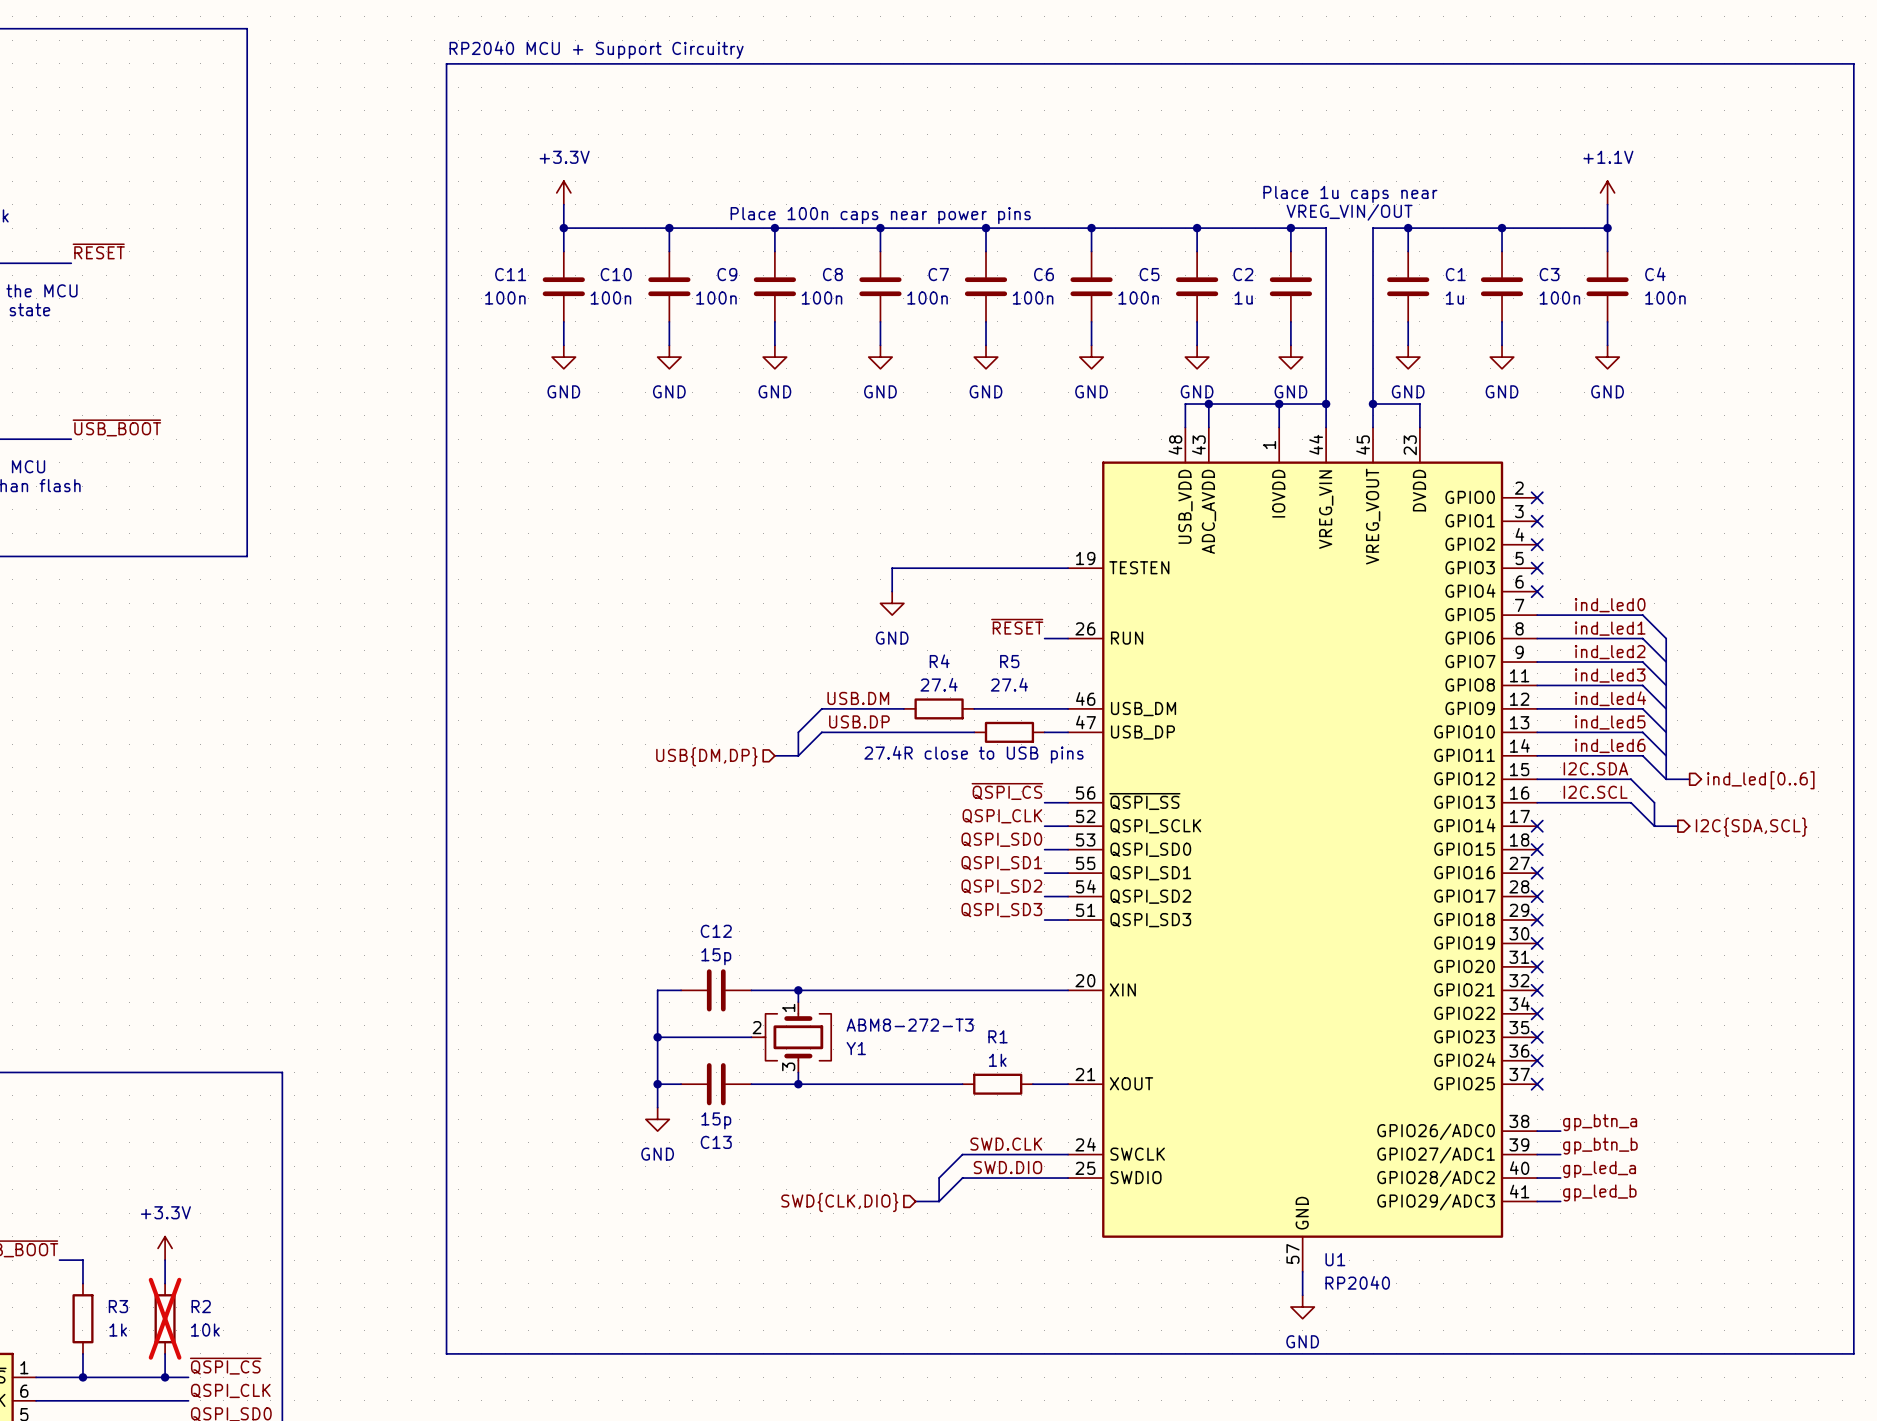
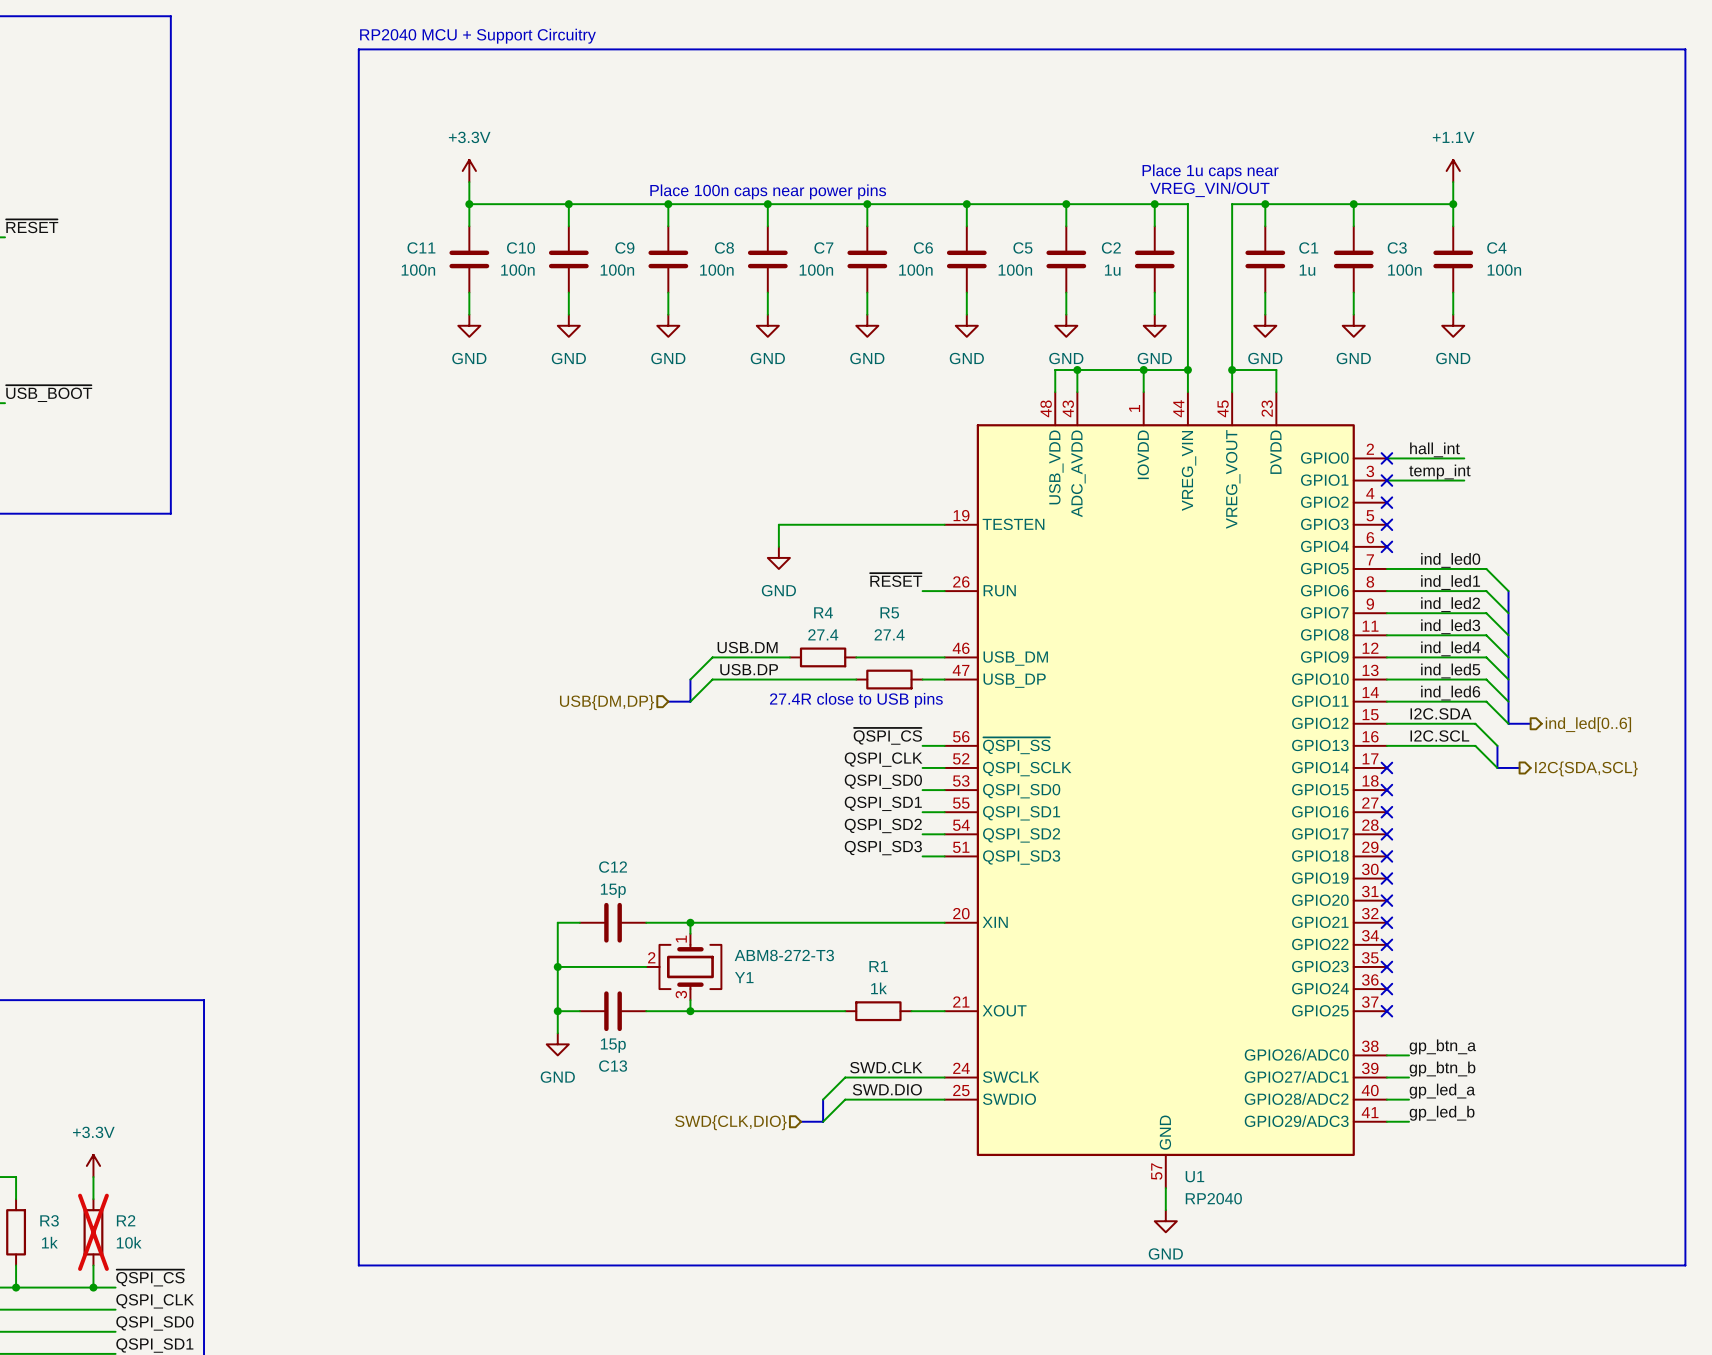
label: none -> hall_int (1434, 449)
wire: none -> (1386, 458) (1464, 458)
label: none -> temp_int (1439, 472)
wire: none -> (1386, 480) (1464, 480)

